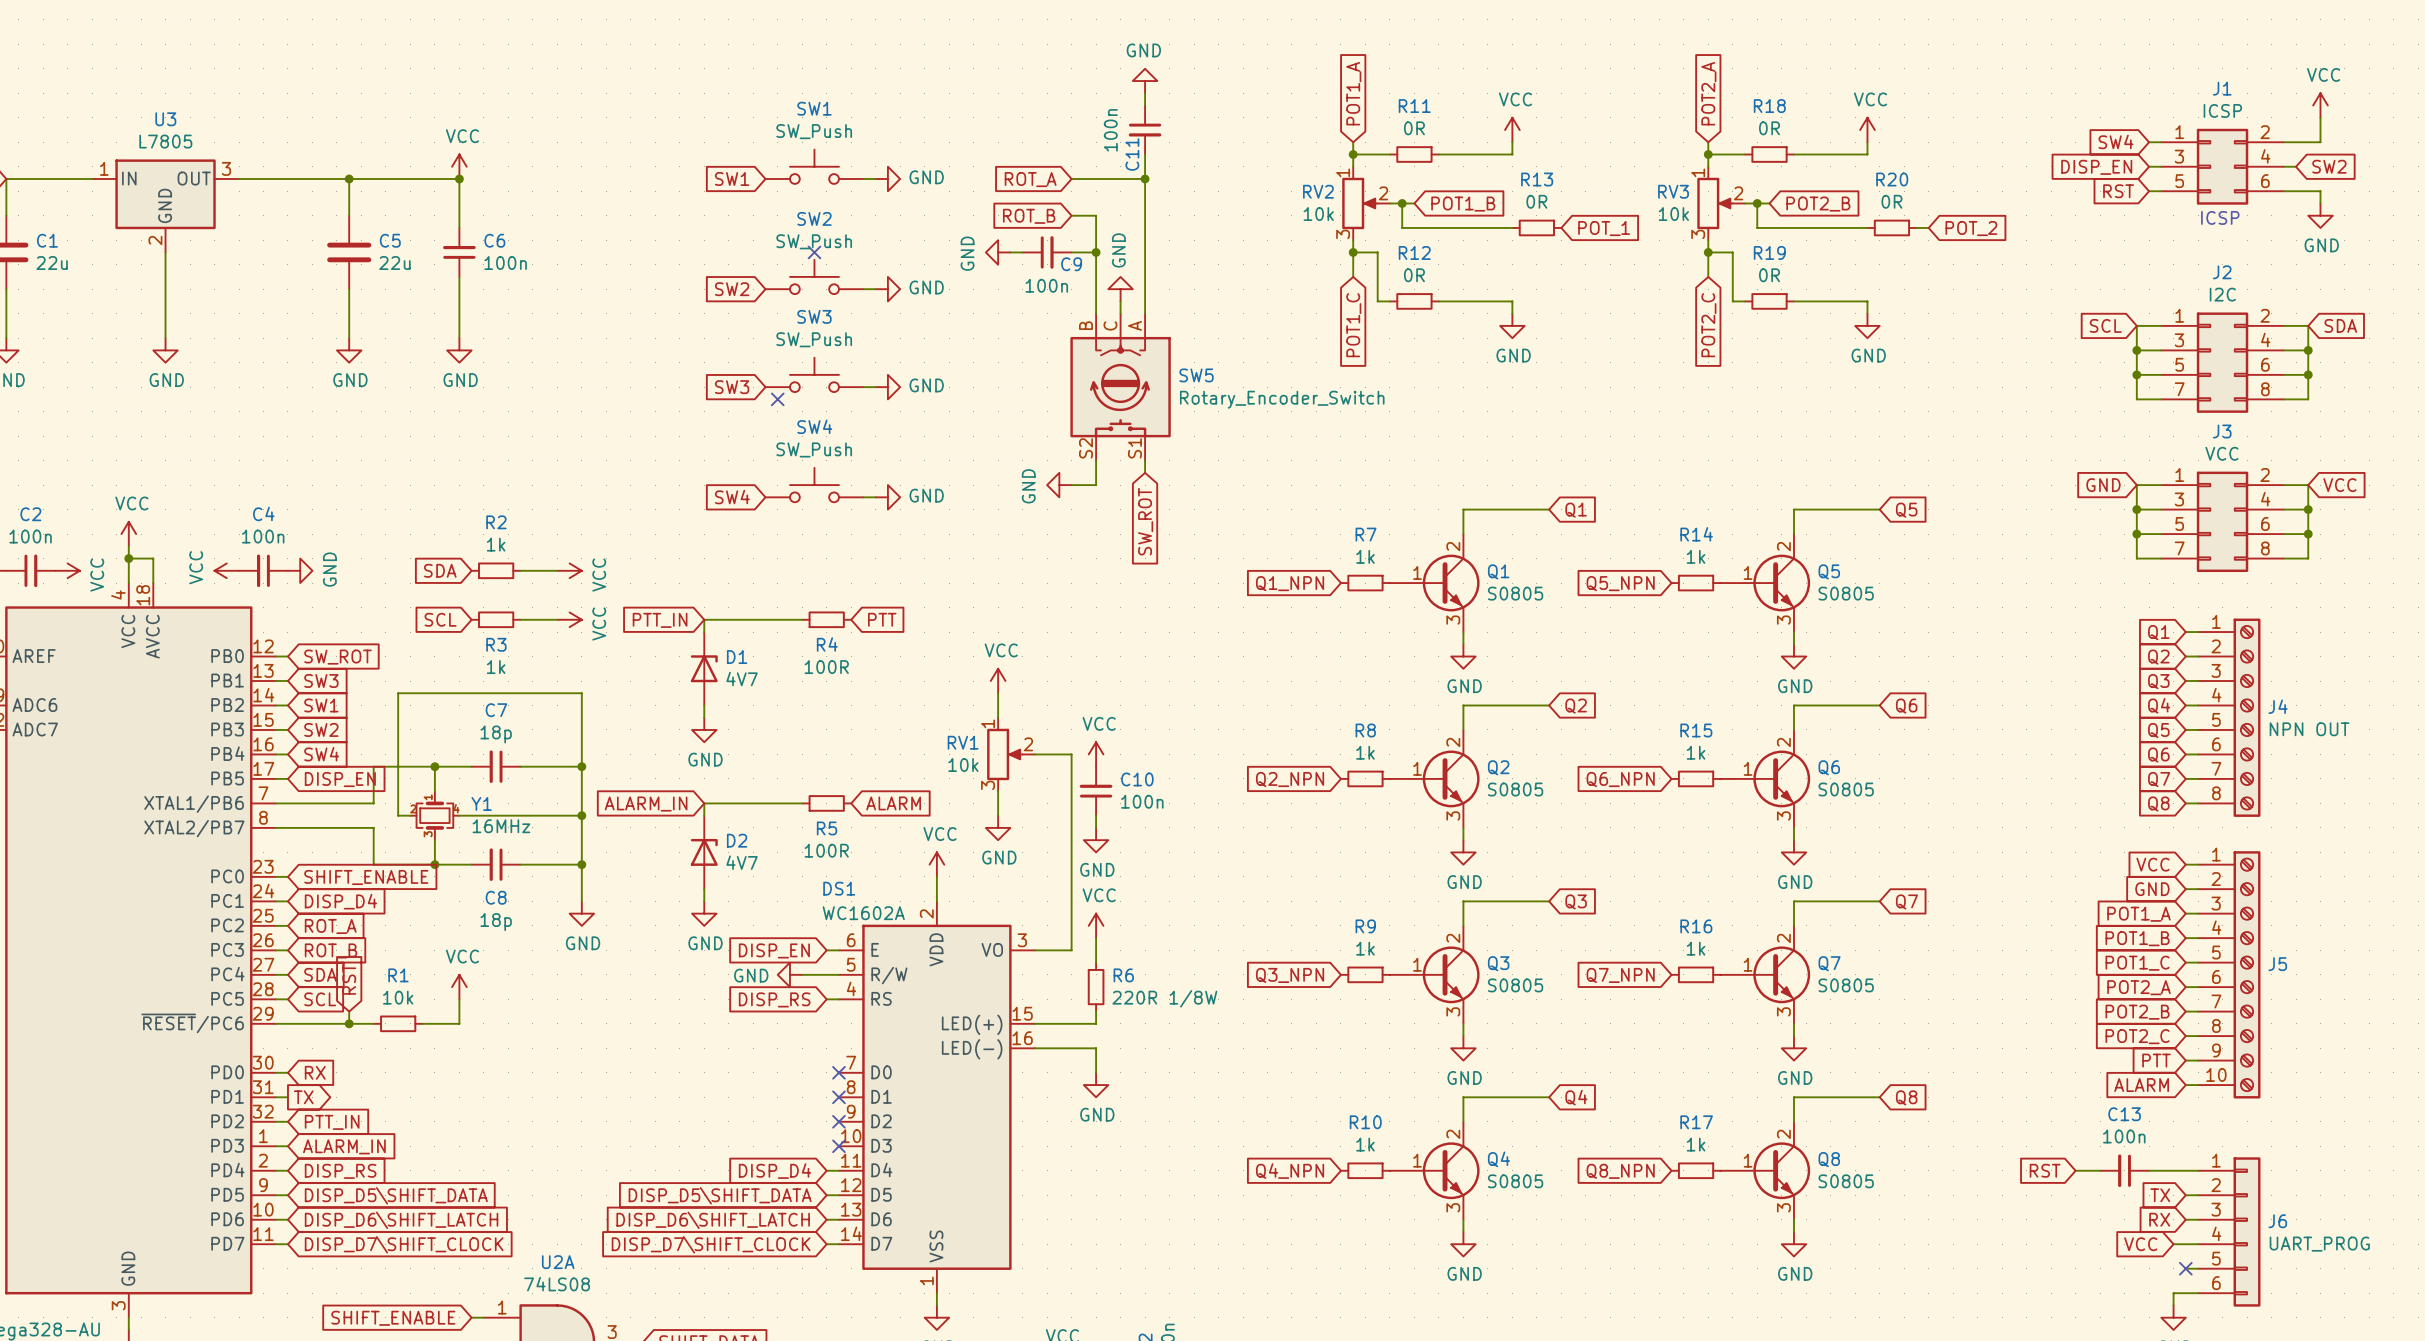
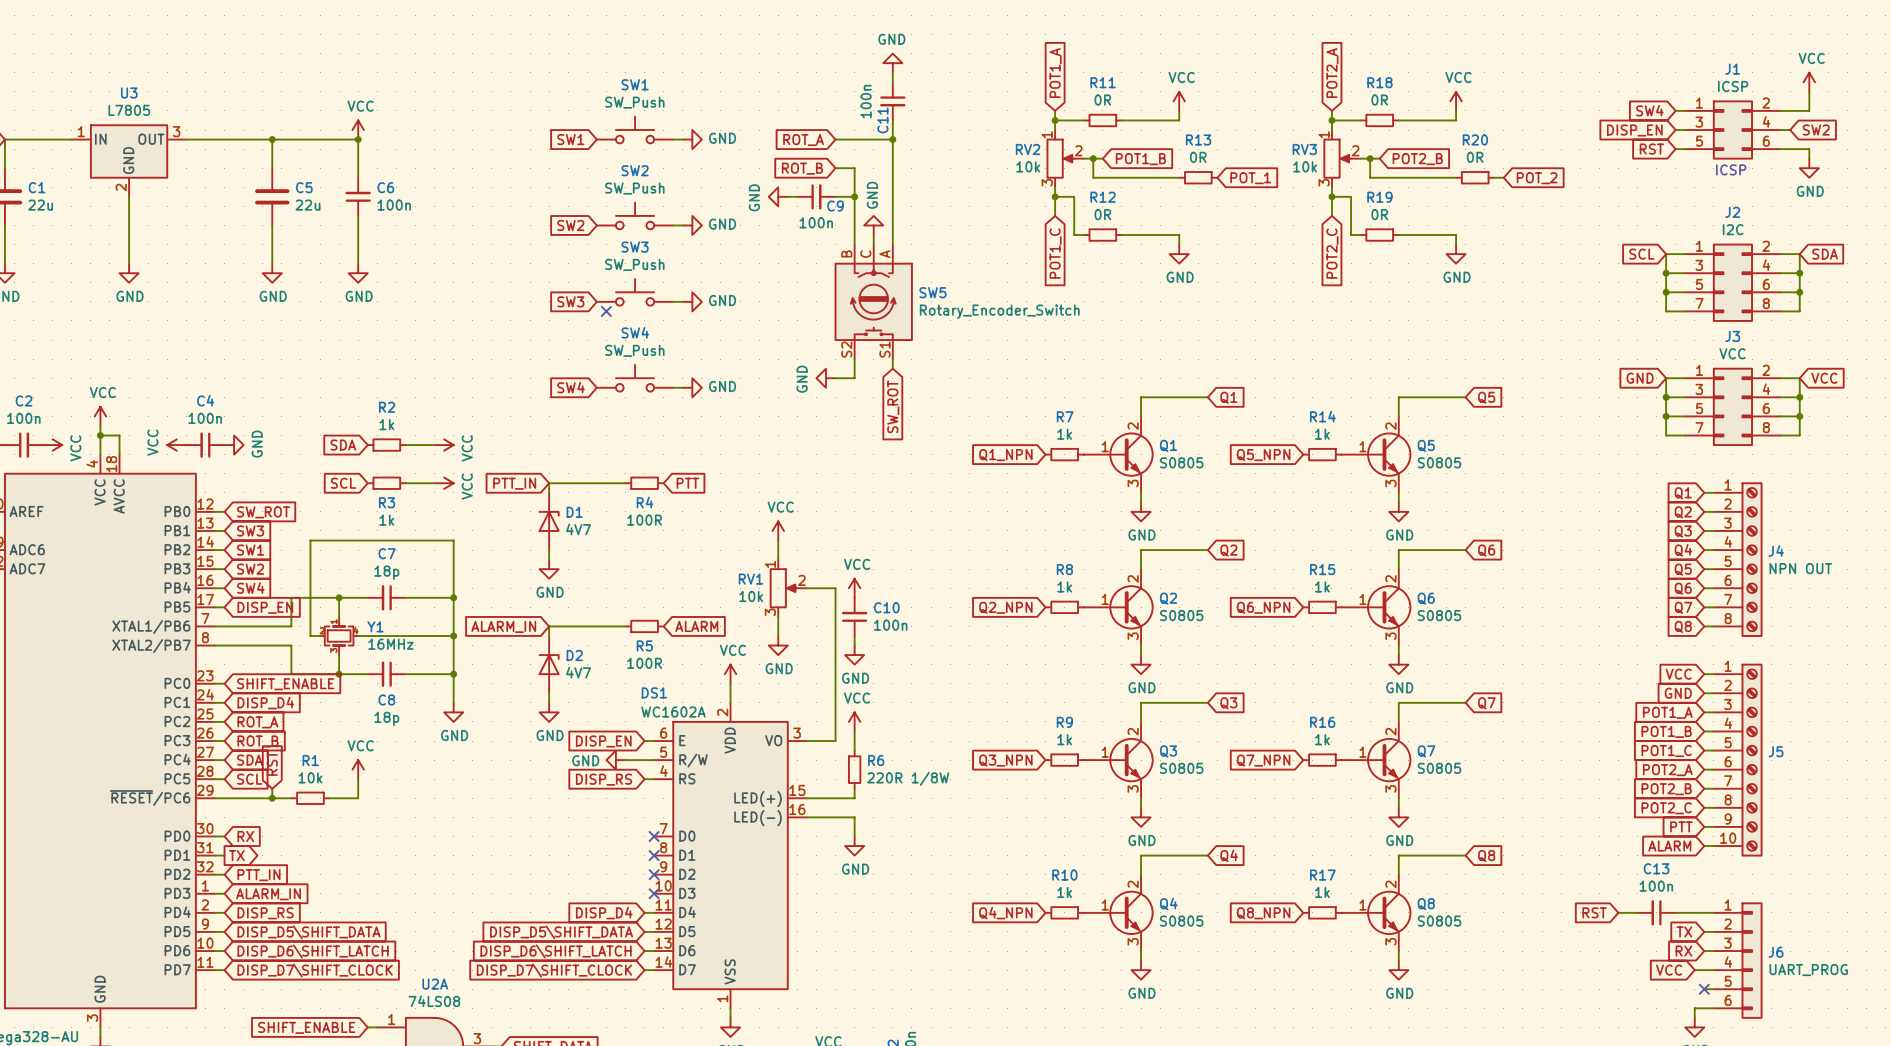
no-connect mark: (814, 252) -> none

